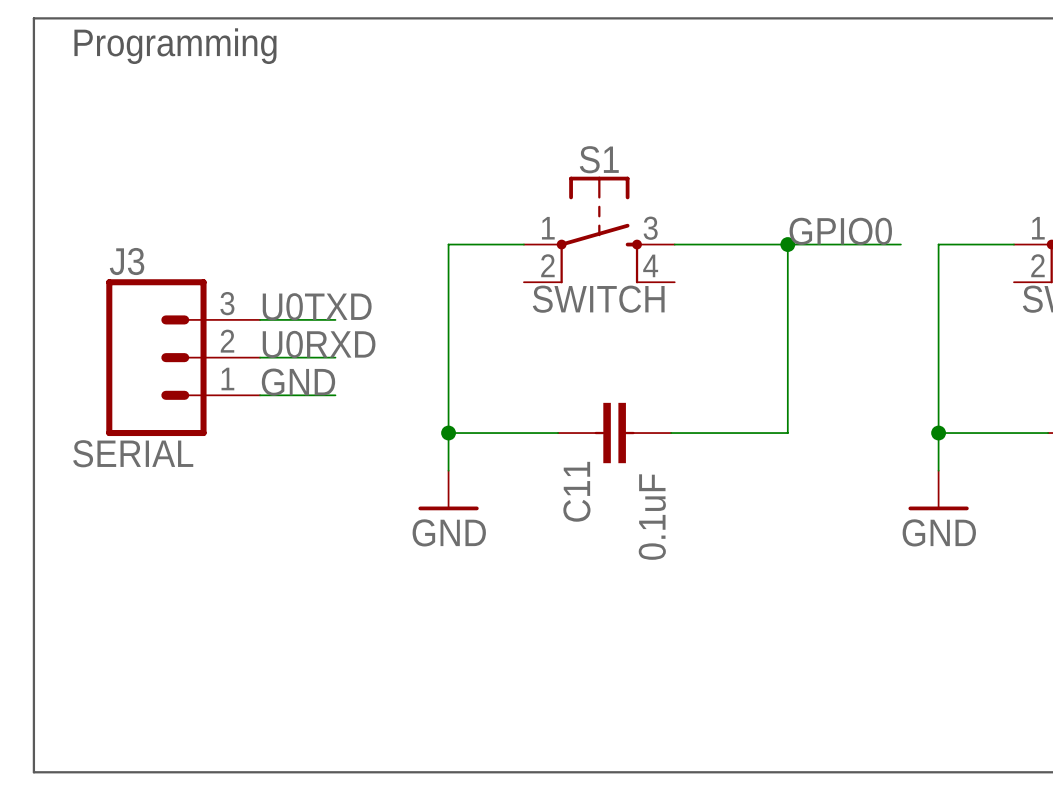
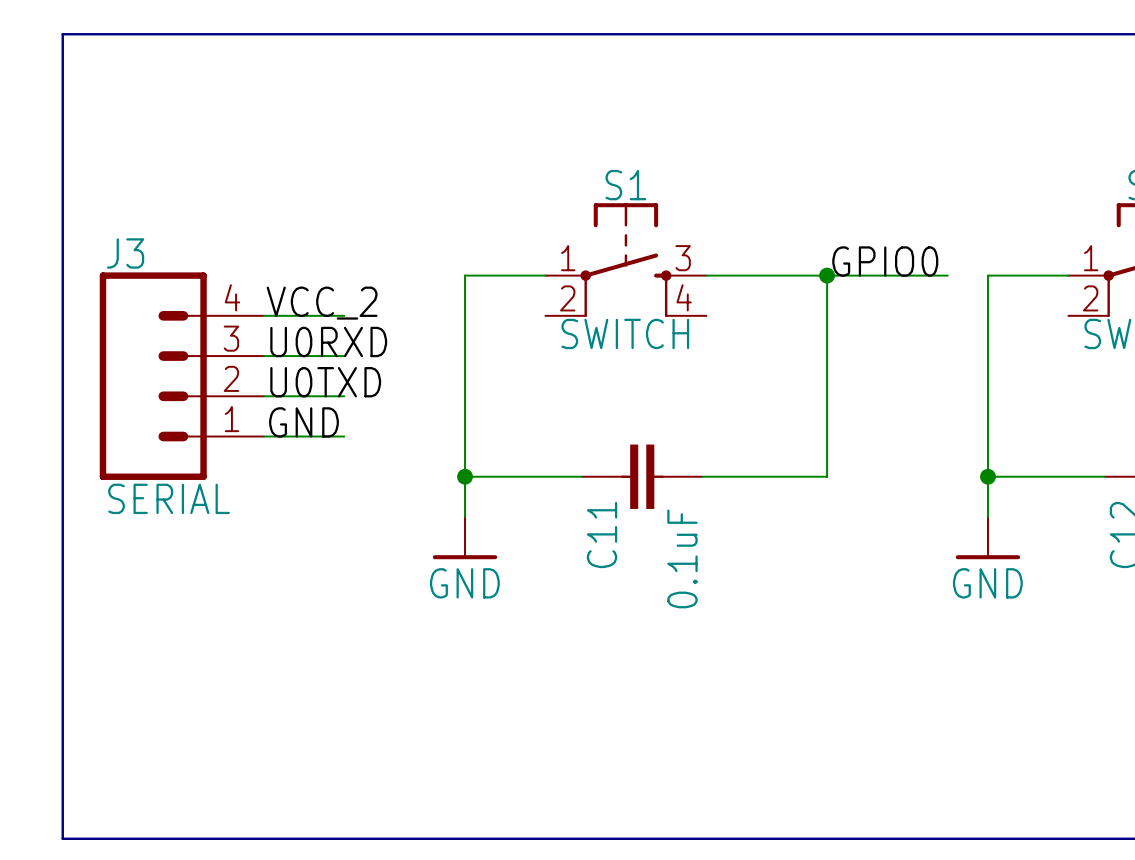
line: (71, 18) (33, 18) (33, 772) (71, 772) -> (62, 34) (62, 838)
text: Programming (175, 46) -> none
label: none -> VCC_2 (322, 303)
J3 symbol: [106, 279, 261, 437] -> [99, 272, 264, 480]
wire: none -> (263, 315) (344, 315)
label: U0TXD (317, 306) -> U0RXD (328, 341)
label: U0RXD (319, 344) -> U0TXD (325, 382)
J3 value position: SERIAL (133, 453) -> SERIAL (169, 498)

